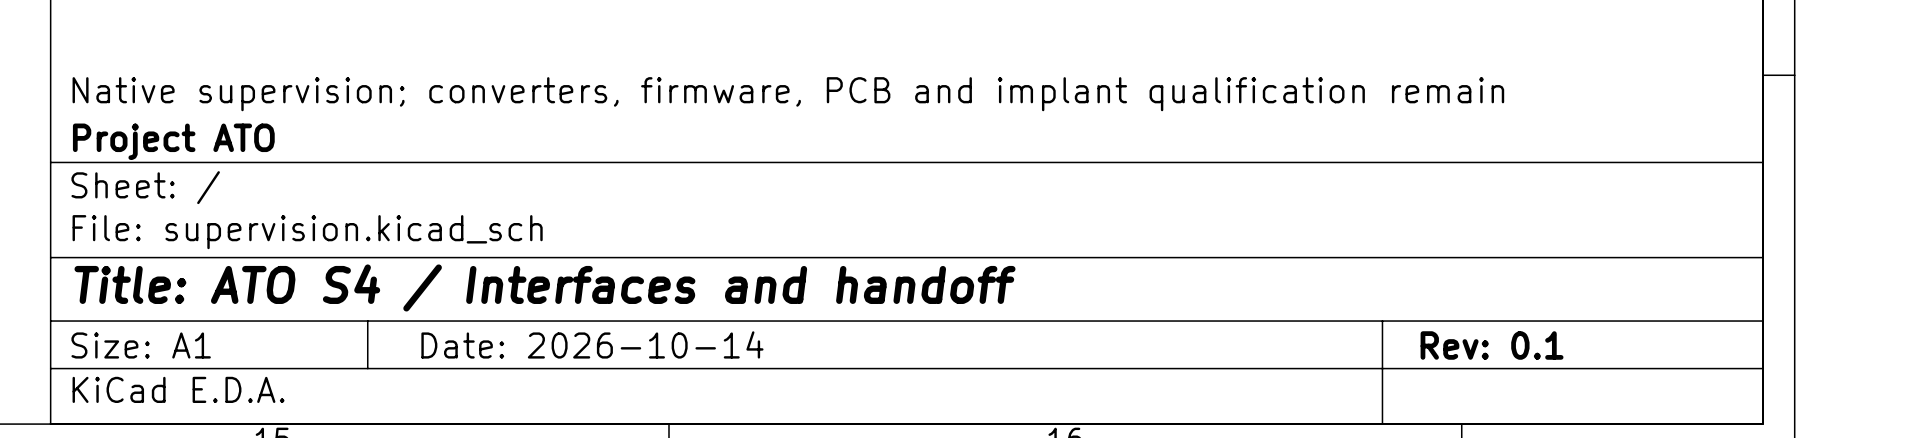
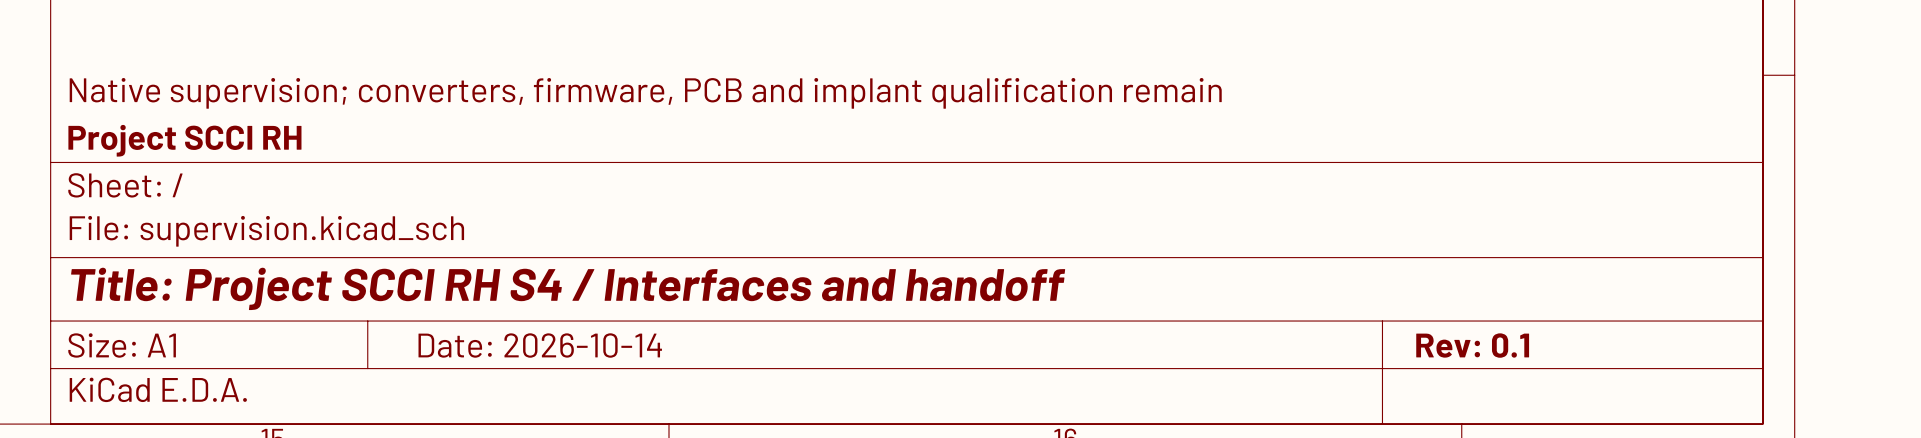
title block: Project ATO (173, 141) -> Project SCCI RH (184, 140)
title block: Title: ATO S4 / Interfaces and handoff (545, 287) -> Title: Project SCCI RH S4 / Interfaces and handoff (568, 288)

